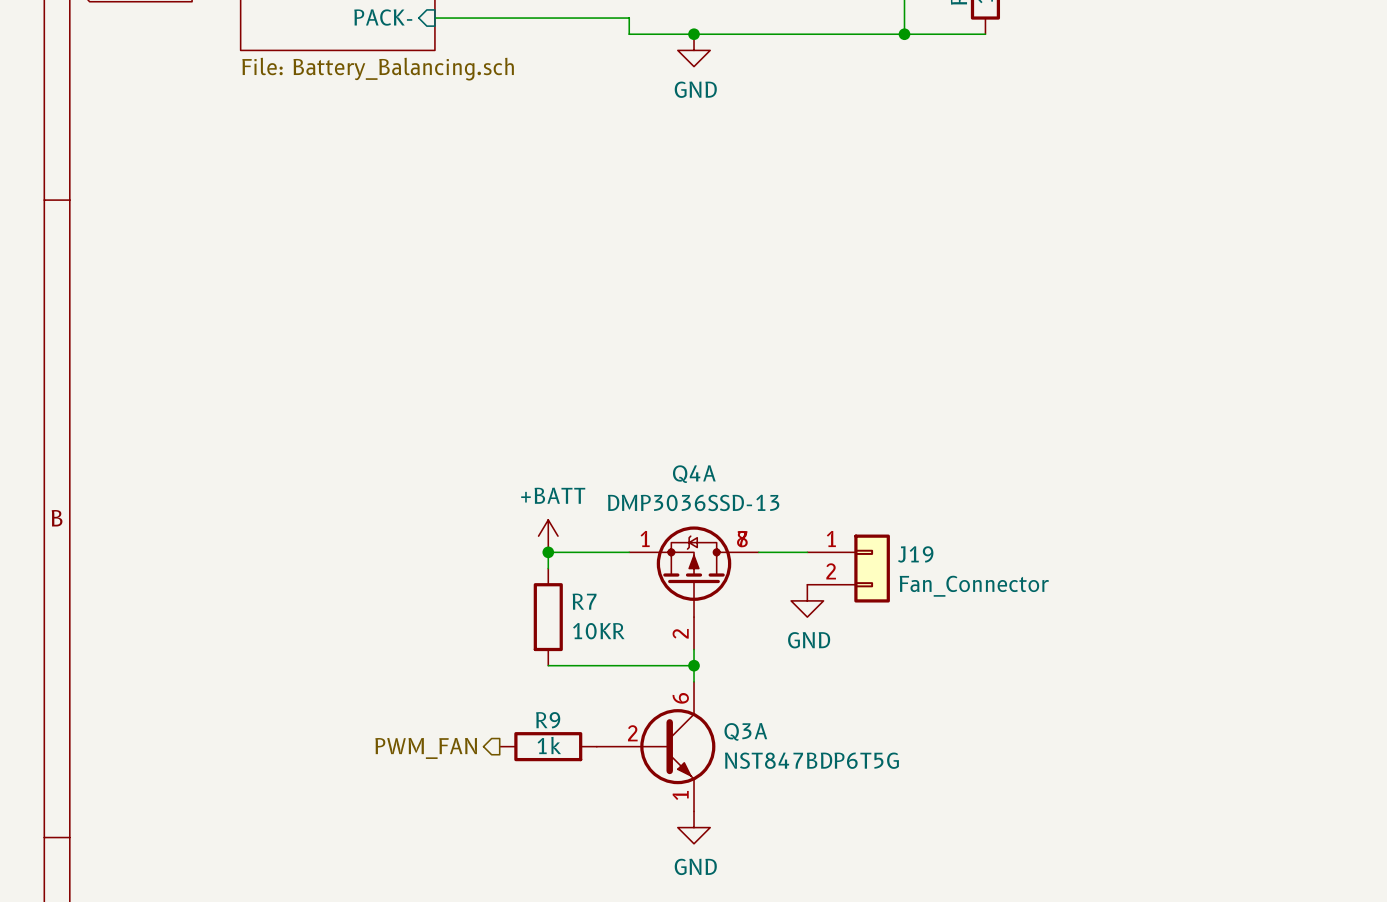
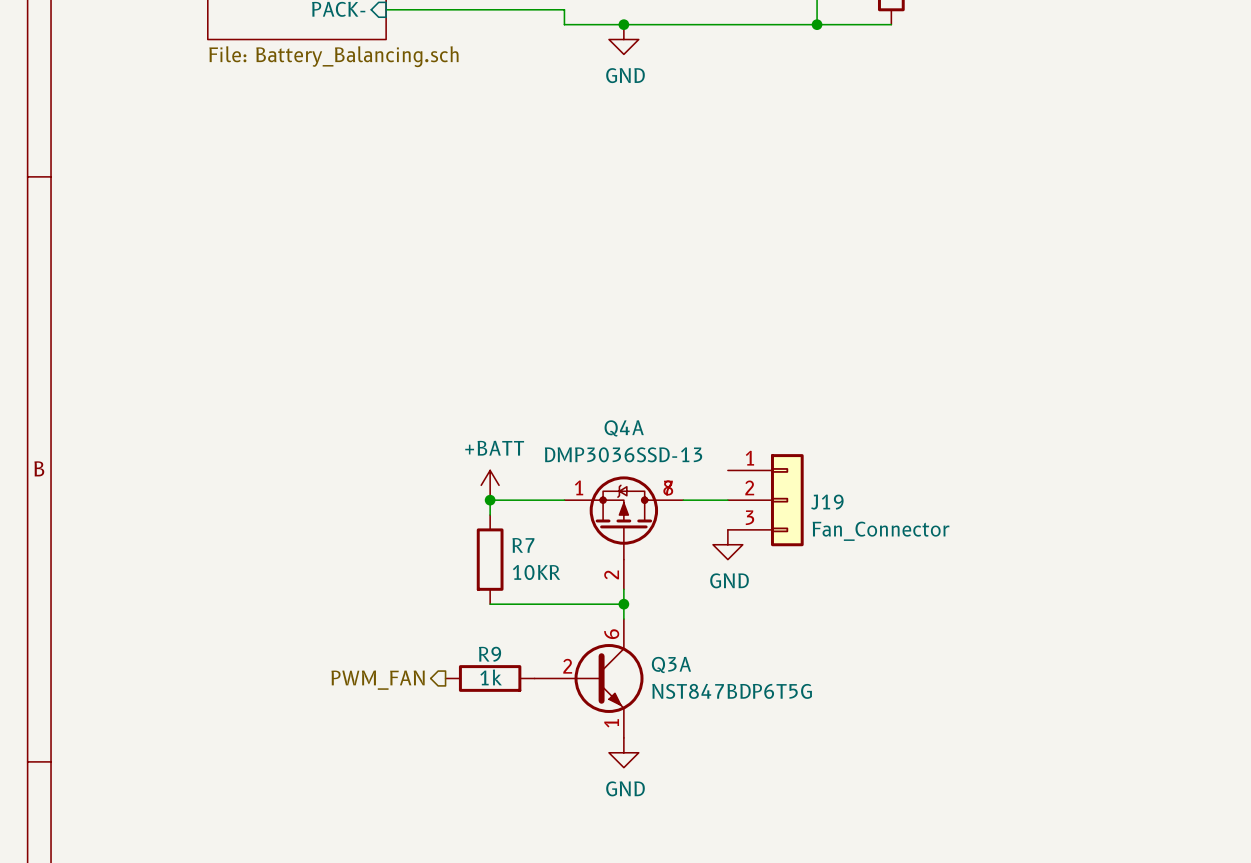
J19 symbol: [807, 534, 890, 603] -> [727, 454, 804, 547]

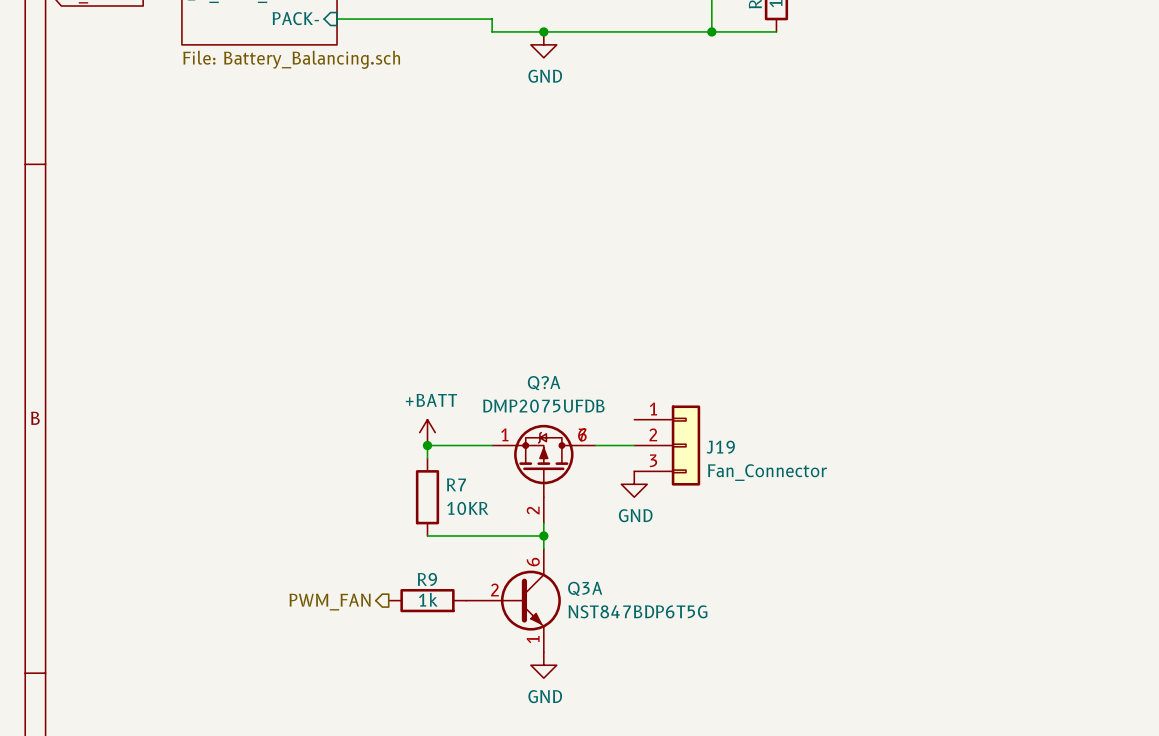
Q4A name: Q4A (624, 428) -> Q?A (544, 383)
Q4A value: DMP3036SSD-13 (623, 454) -> DMP2075UFDB (543, 406)
Q4A symbol: [564, 476, 684, 590] -> [492, 424, 596, 524]

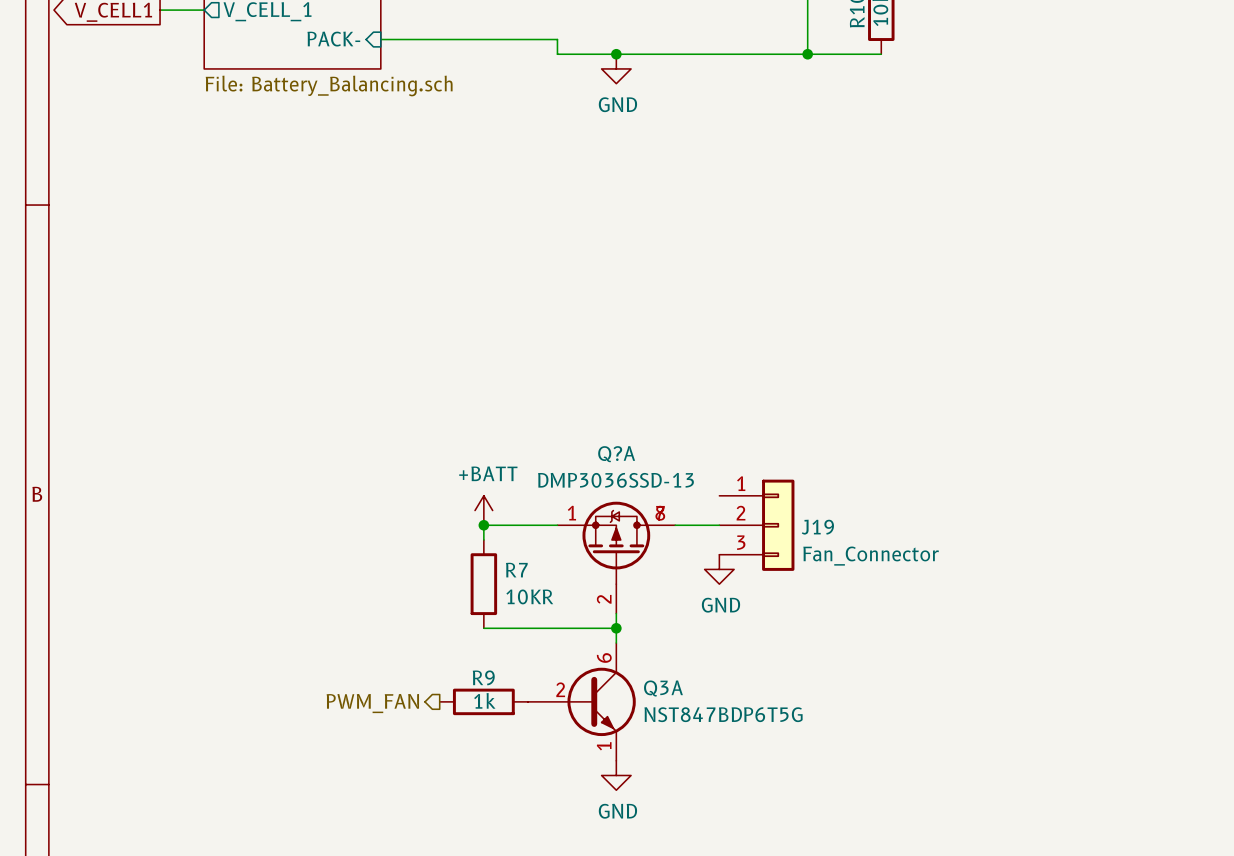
Q?A value: DMP2075UFDB (543, 406) -> DMP3036SSD-13 (615, 480)
Q?A symbol: [492, 424, 596, 524] -> [557, 501, 676, 614]

